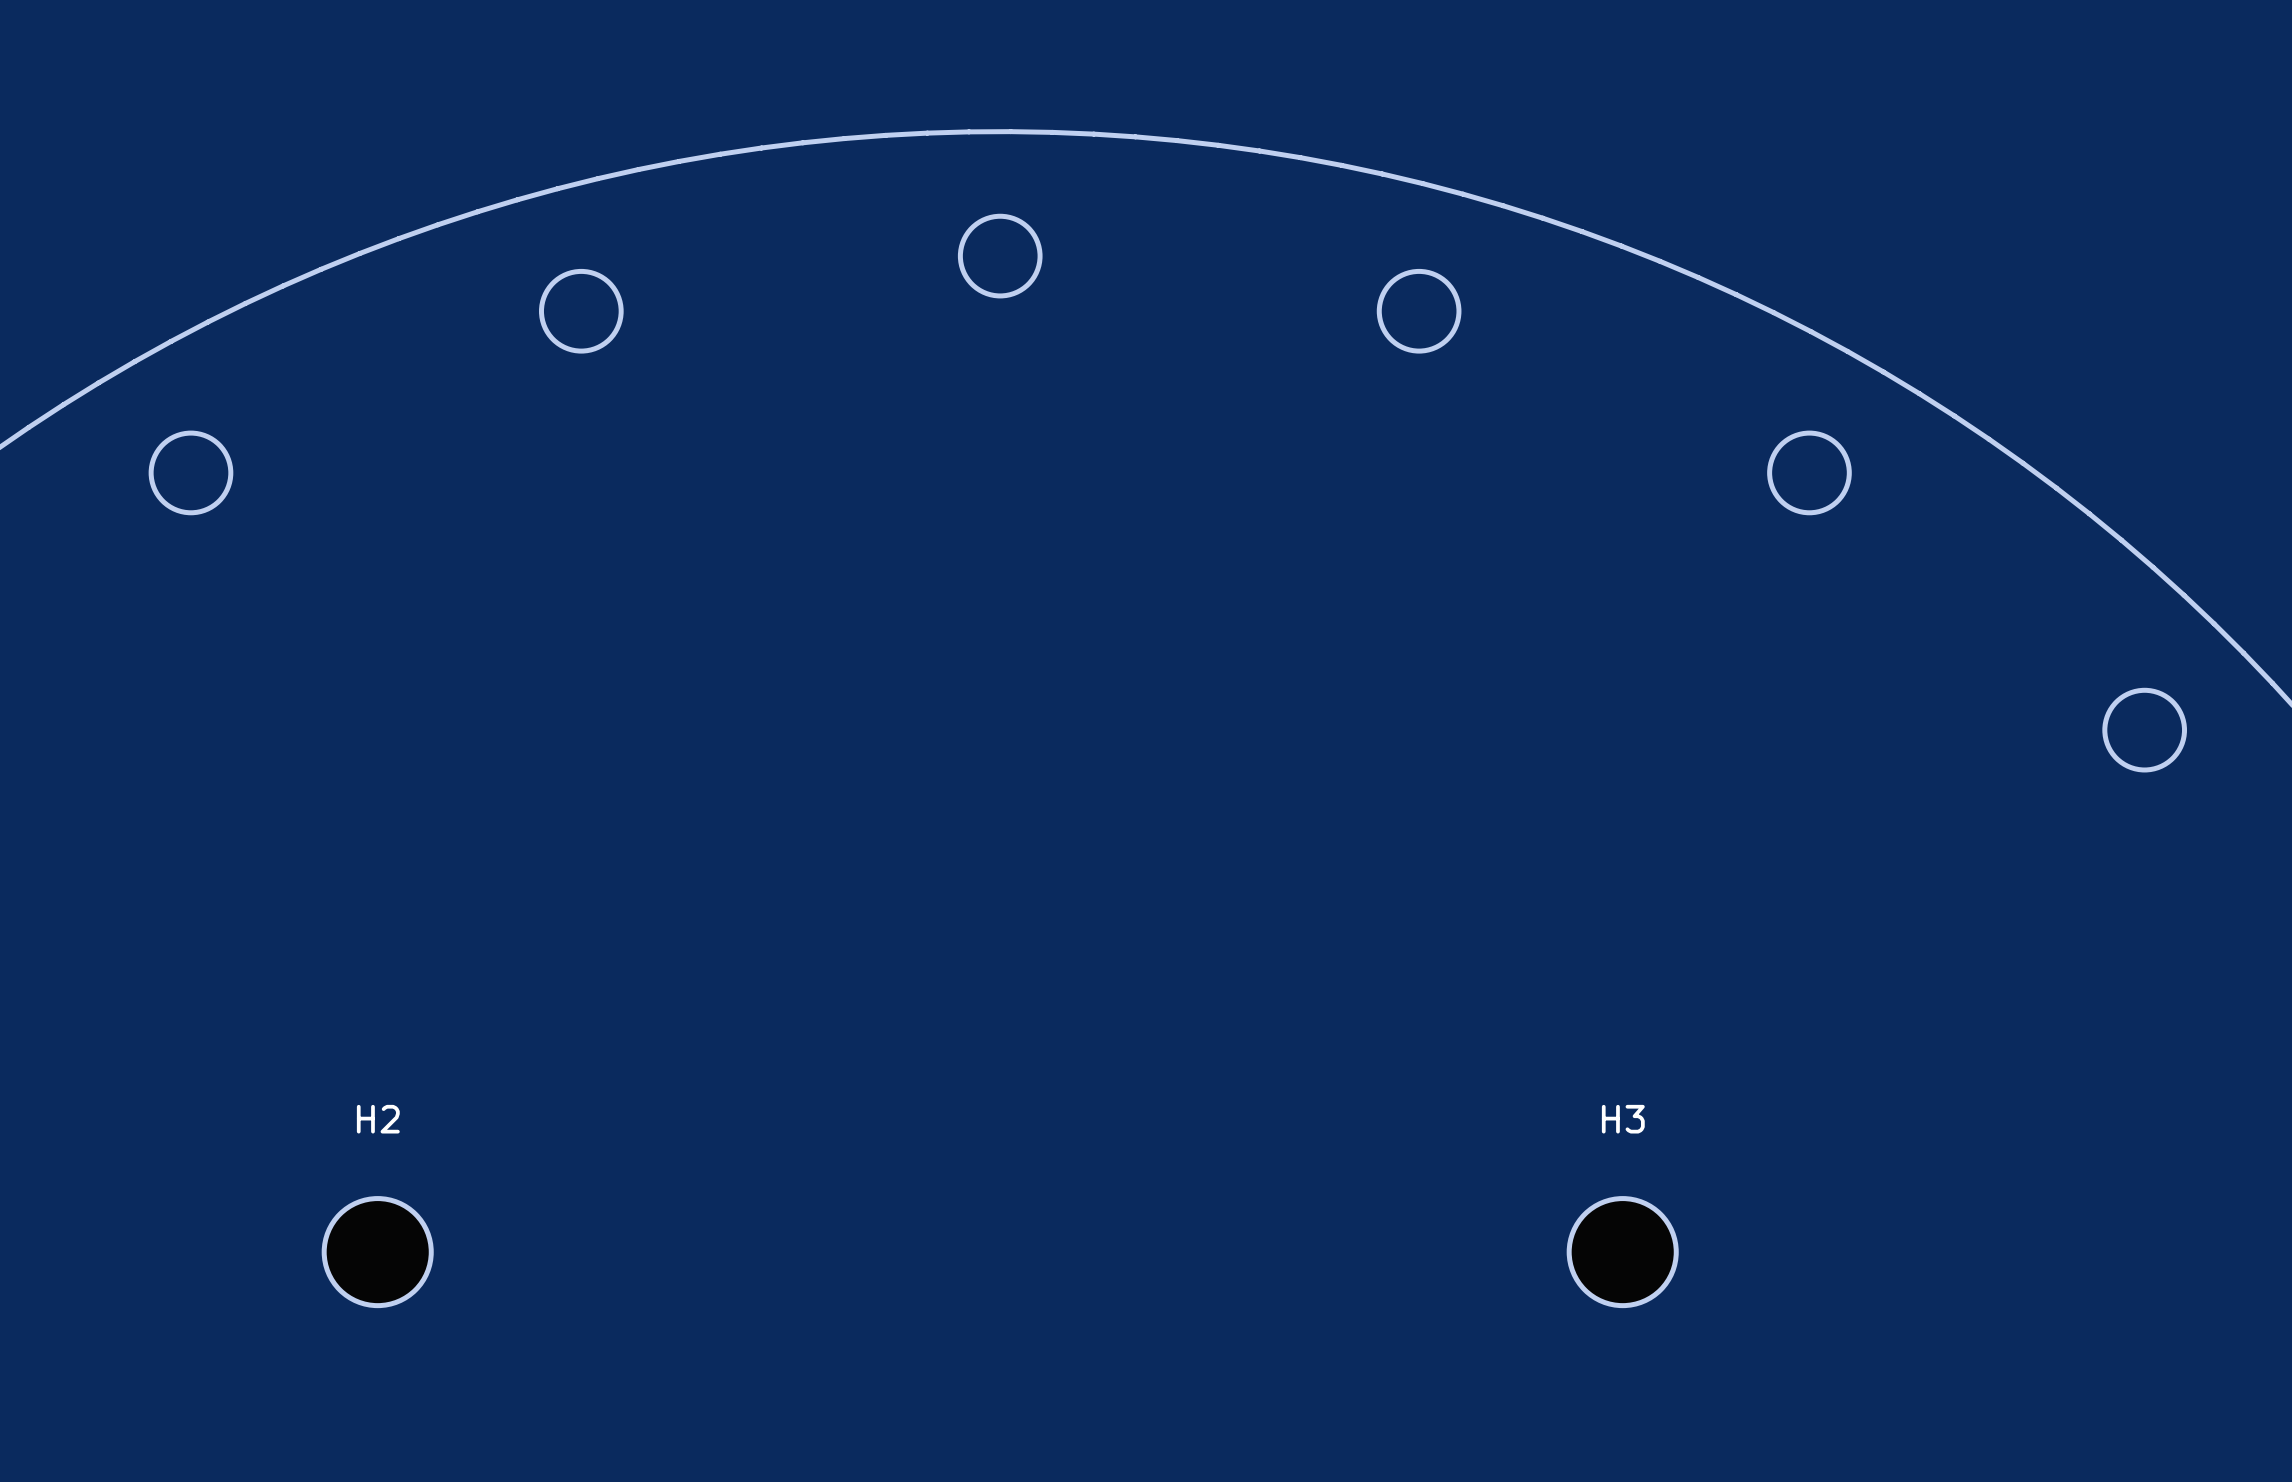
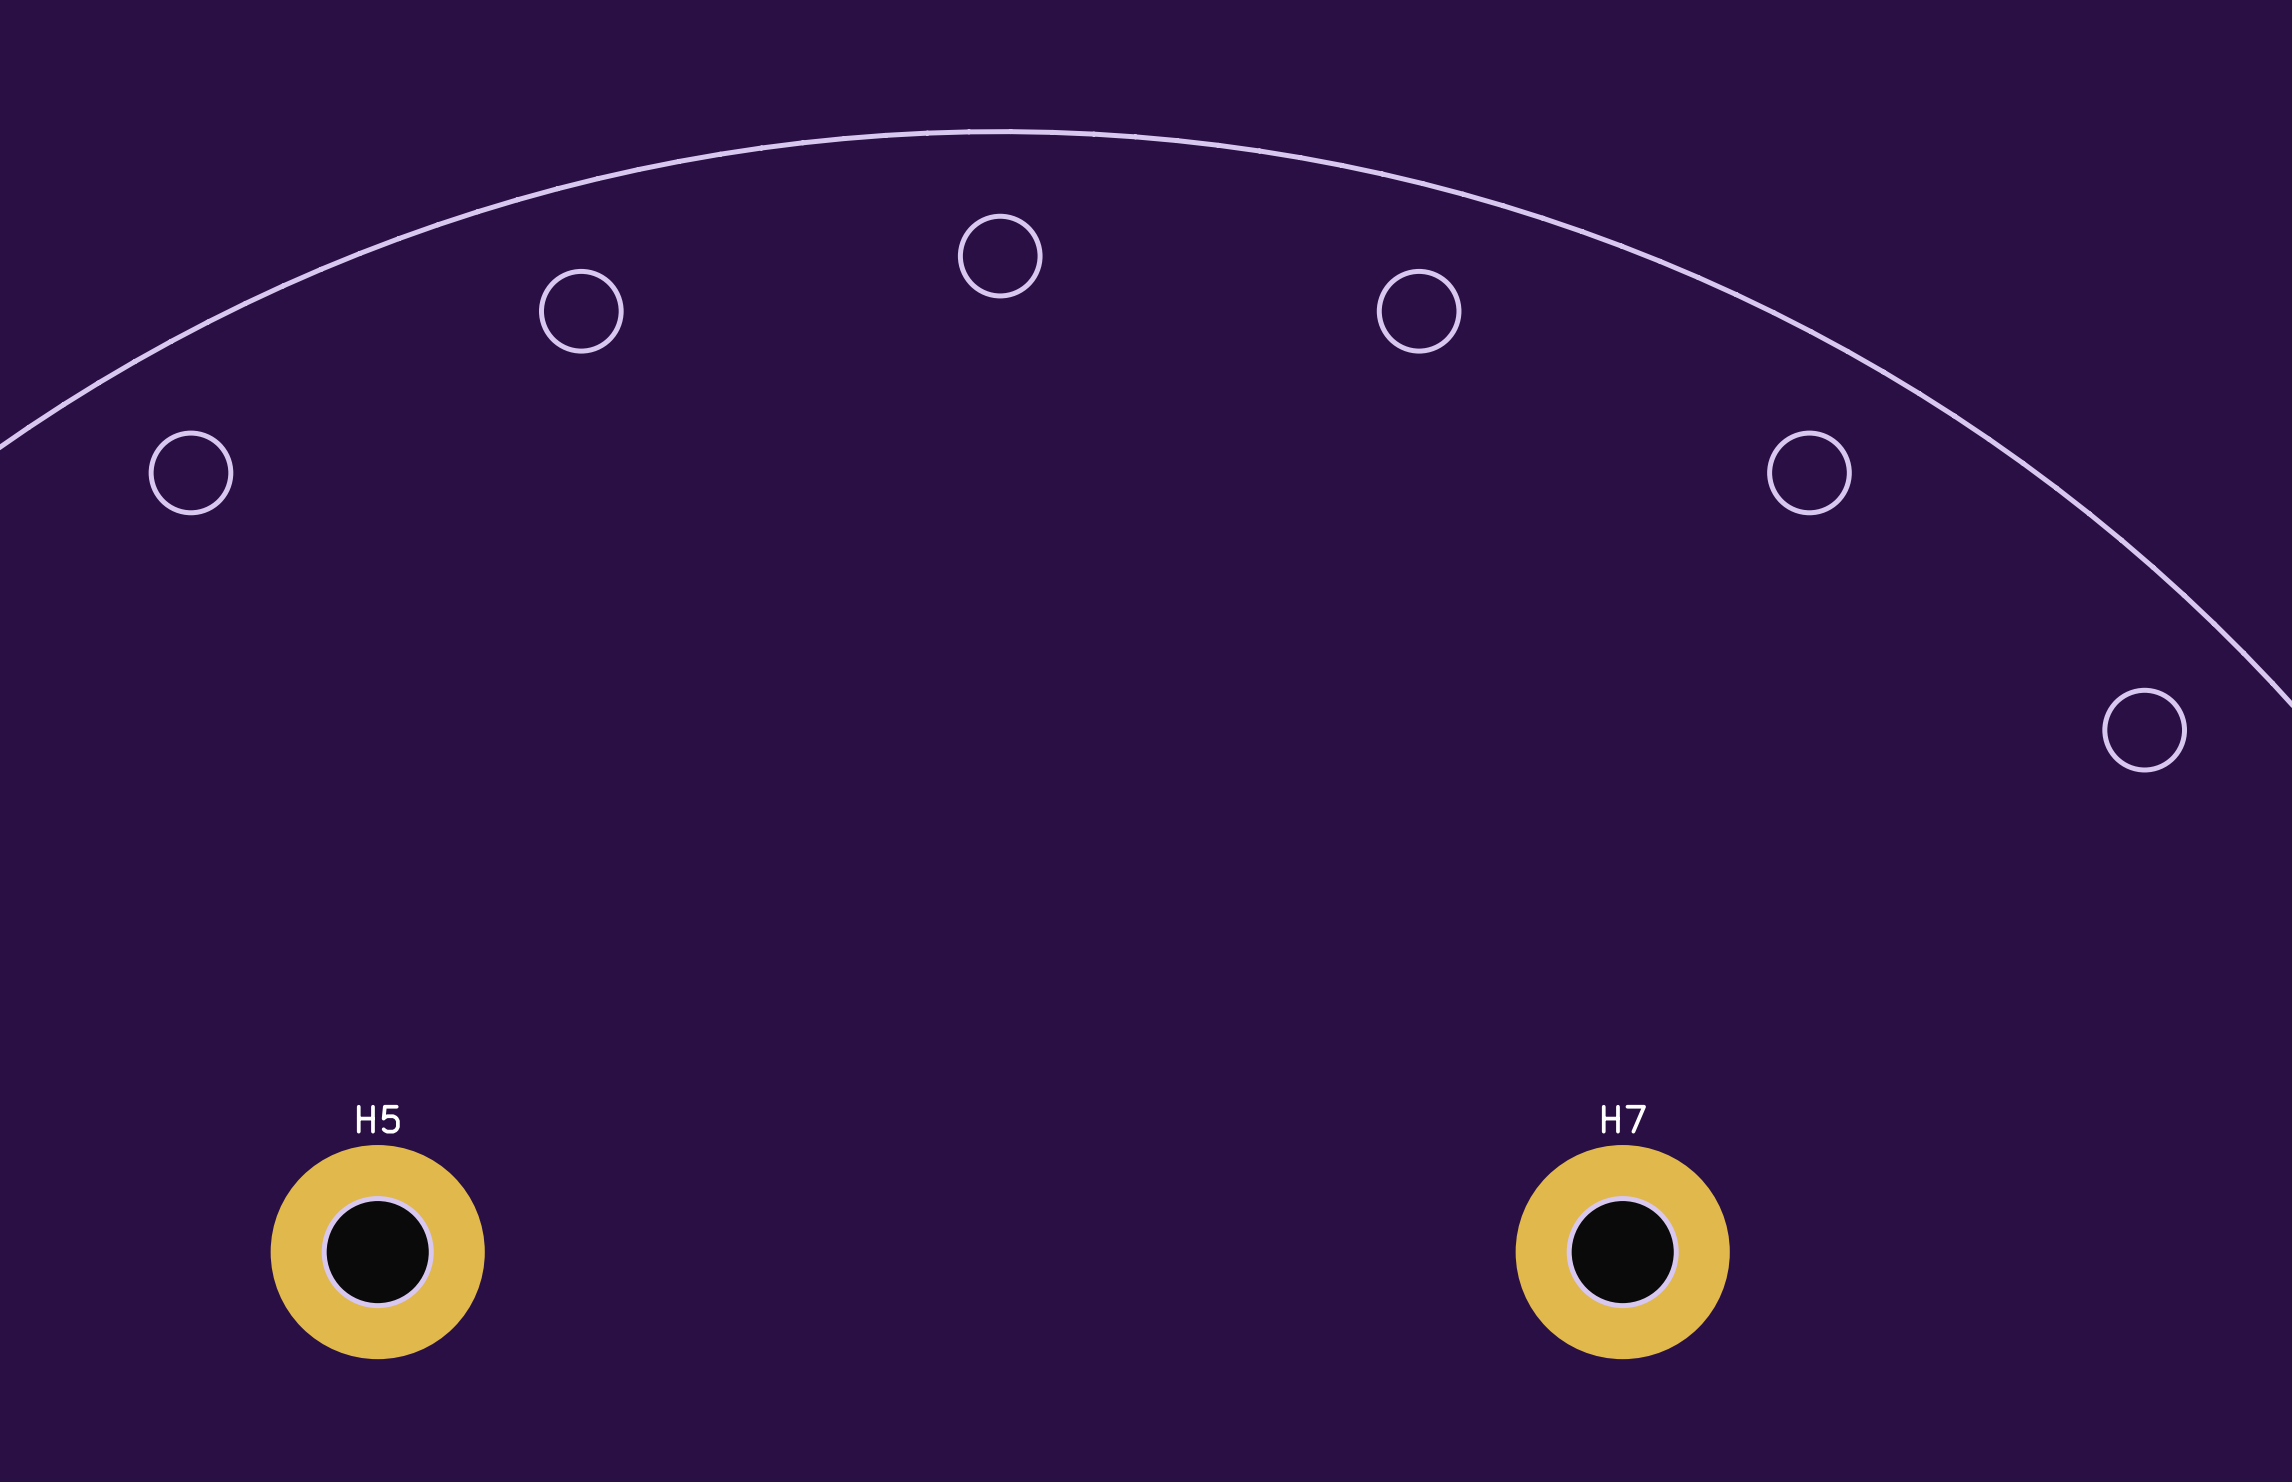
H2: (377, 1252) -> none
H5: none -> (377, 1252)
H3: (1622, 1252) -> none
H7: none -> (1622, 1252)

